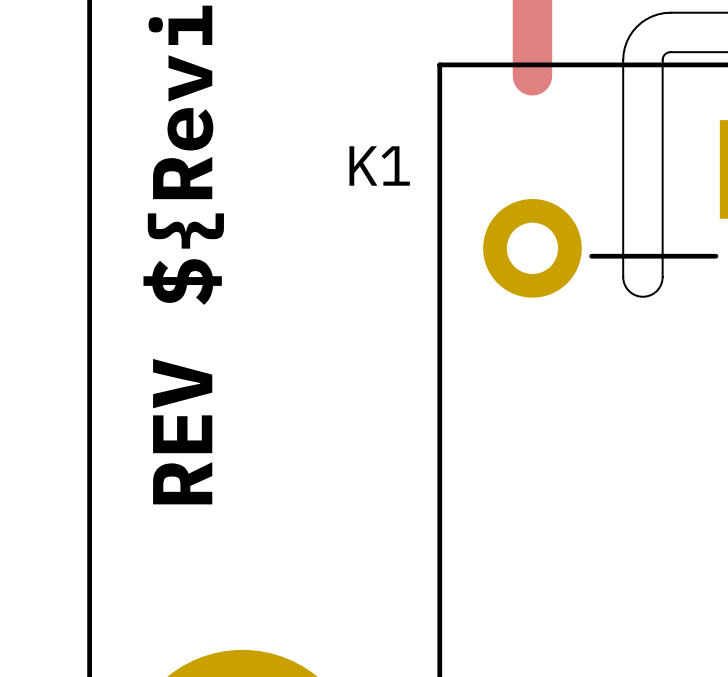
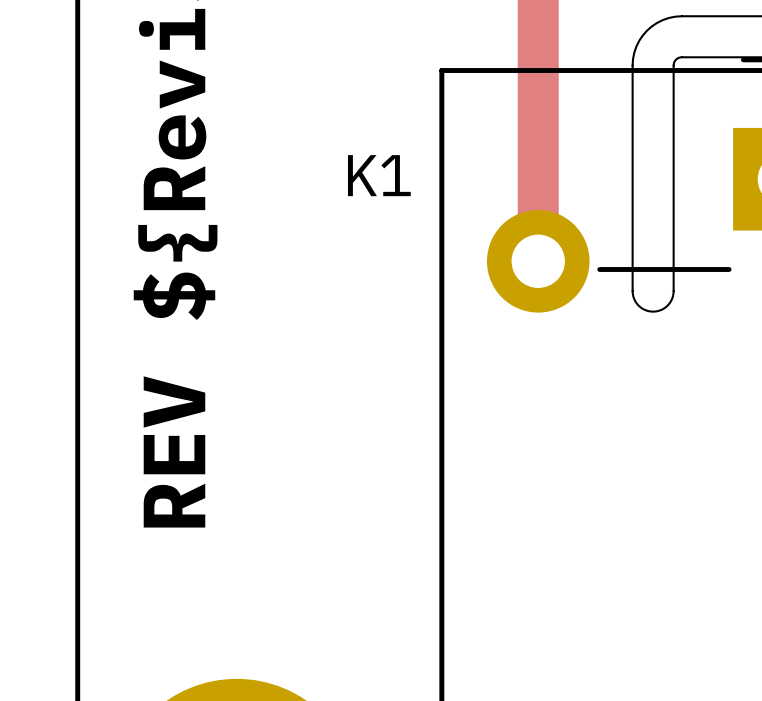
top track: none -> (538, 81) (538, 261)

